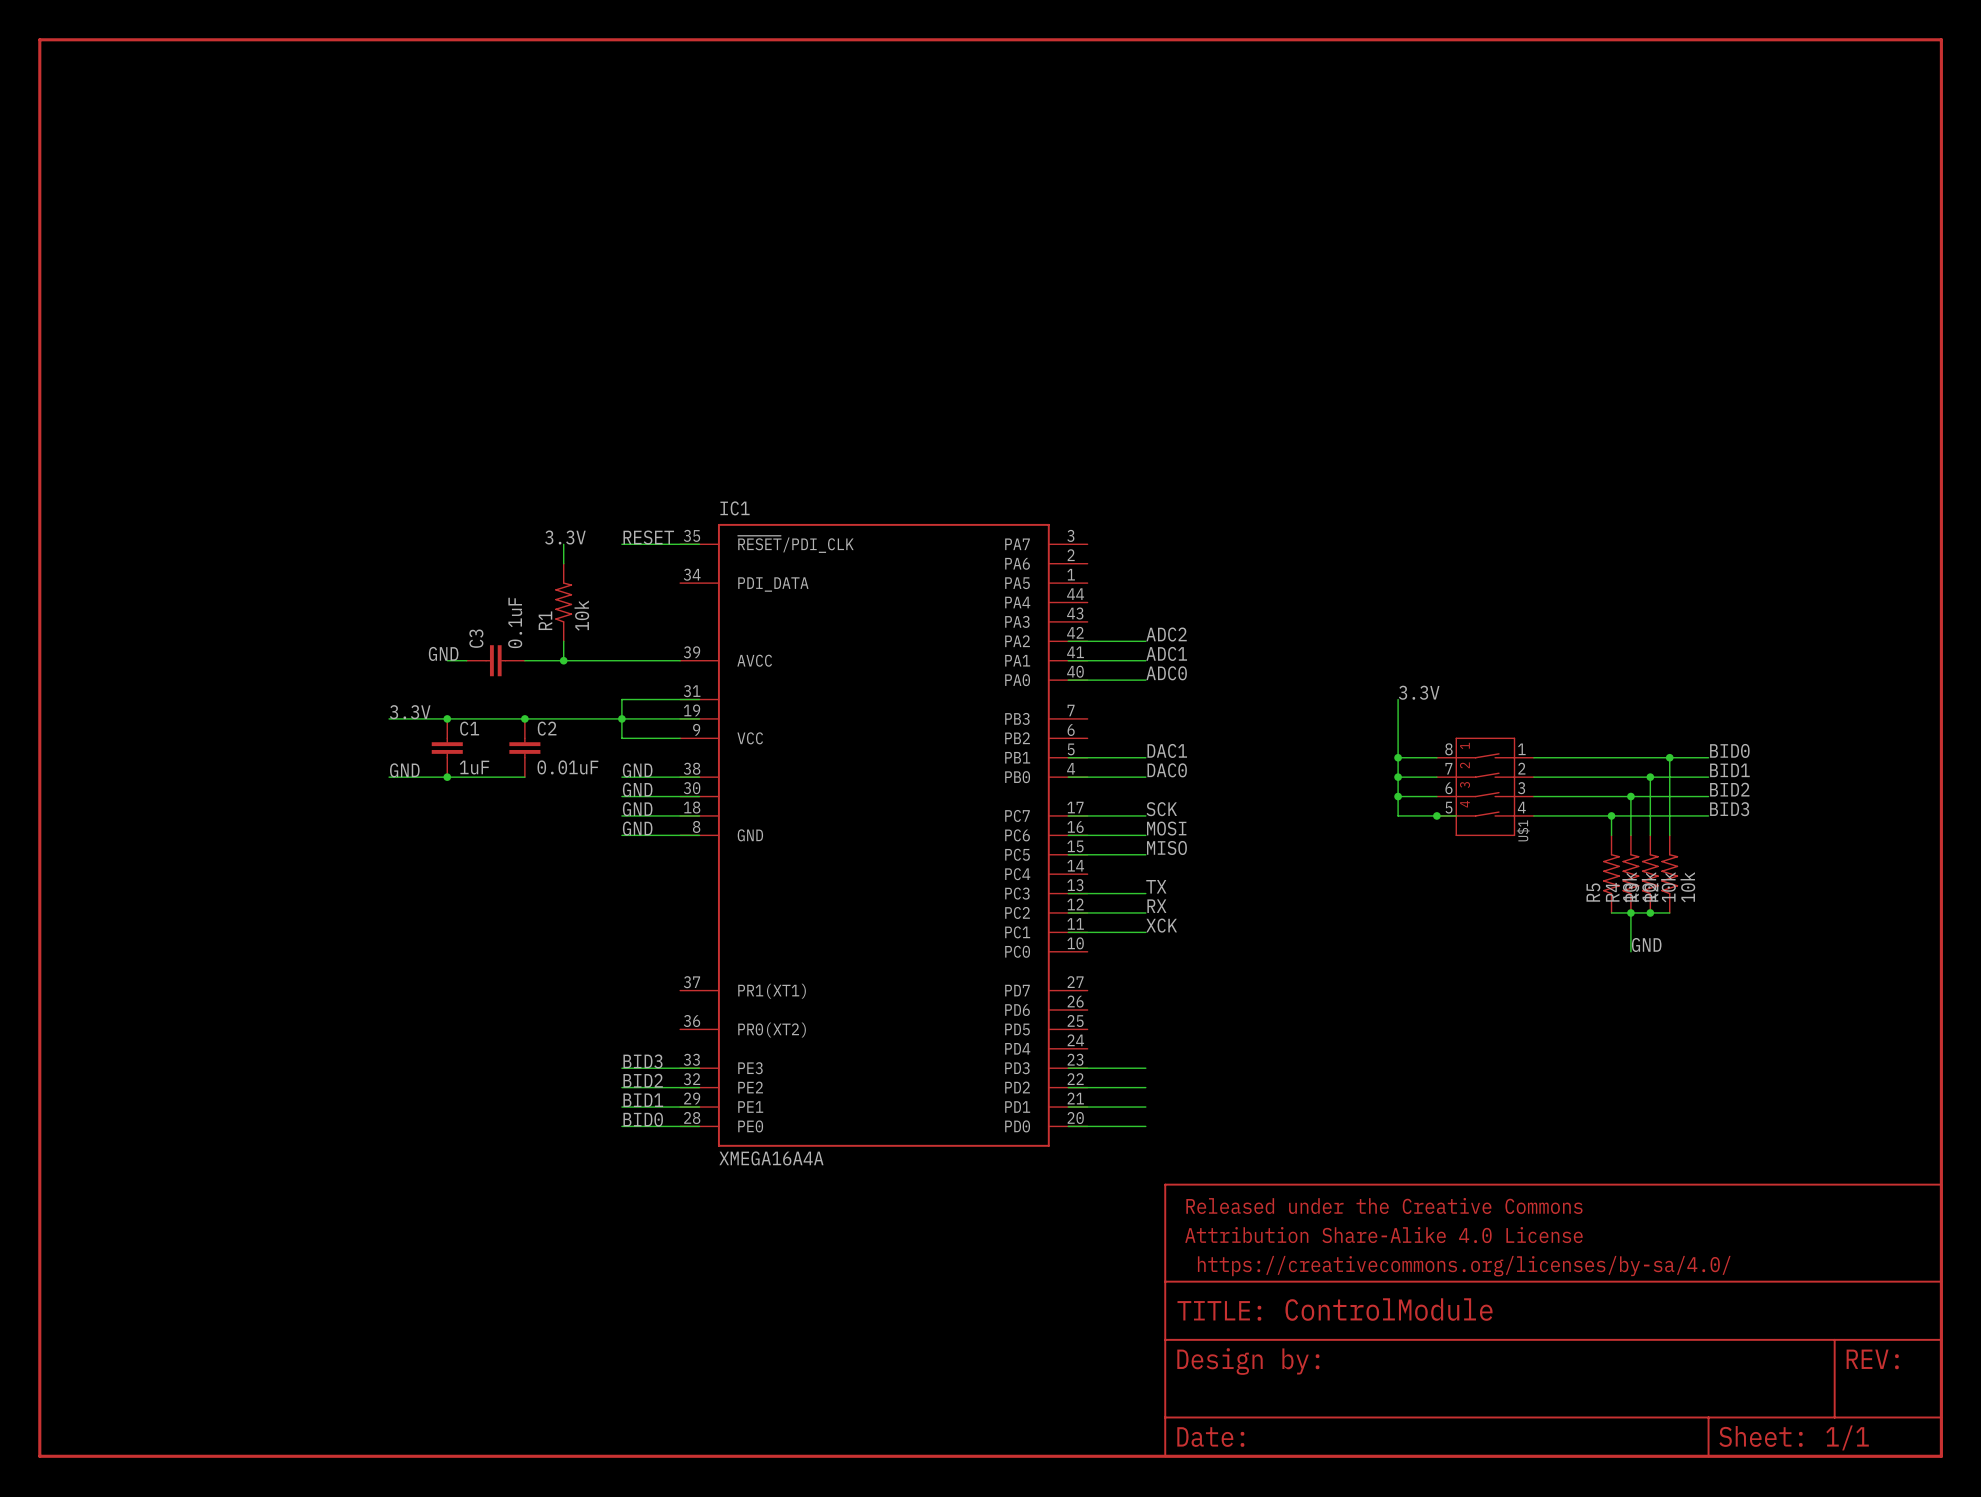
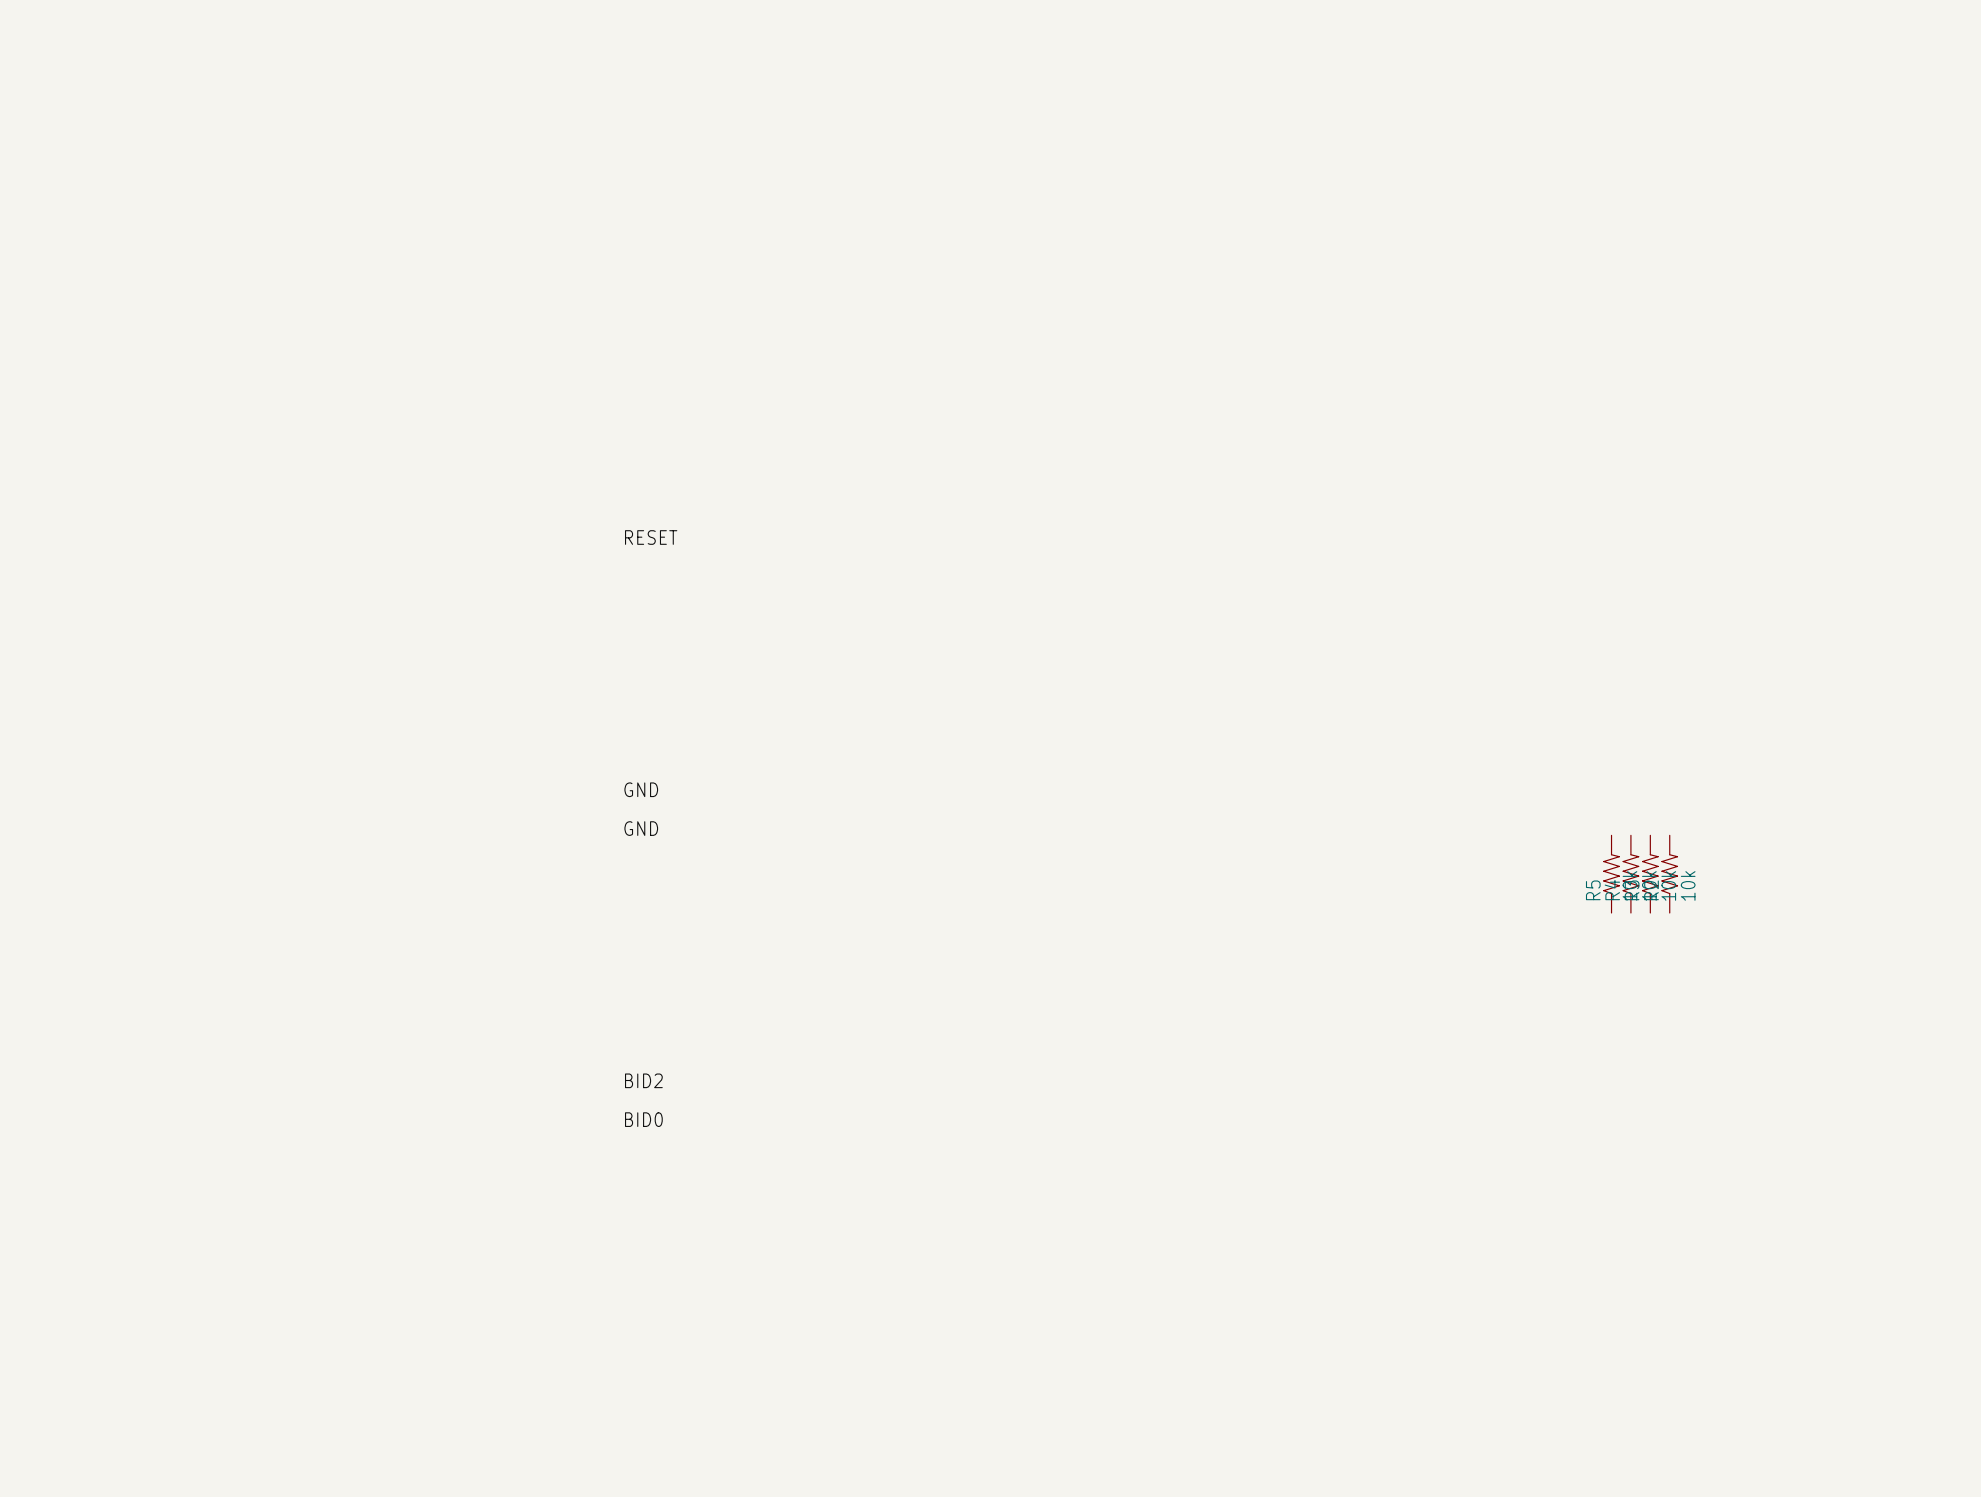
label: 3.3V (565, 537) -> none
wire: (563, 544) (563, 563) -> none
wire: (621, 544) (699, 544) -> none
R1: 10k (563, 602) -> none
label: ADC2 (1166, 634) -> none
wire: (563, 641) (563, 660) -> none
wire: (1068, 641) (1145, 641) -> none
label: GND (443, 653) -> none
label: ADC1 (1166, 653) -> none
wire: (447, 660) (466, 660) -> none
C3: 0.1uF (495, 660) -> none
wire: (524, 660) (680, 660) -> none
junction: (563, 660) -> none
wire: (1068, 660) (1145, 660) -> none
label: ADC0 (1166, 673) -> none
wire: (1068, 680) (1145, 680) -> none
label: 3.3V (1419, 692) -> none
wire: (699, 699) (621, 699) (621, 738) (680, 738) -> none
wire: (1398, 699) (1398, 815) (1456, 815) -> none
label: 3.3V (410, 712) -> none
wire: (389, 718) (699, 718) -> none
junction: (447, 718) -> none
junction: (524, 718) -> none
junction: (621, 718) -> none
C1: 1uF (447, 748) -> none
C2: 0.01uF (524, 748) -> none
part: (990, 748) -> none
label: DAC1 (1167, 750) -> none
label: BID0 (1729, 750) -> none
wire: (1068, 757) (1145, 757) -> none
wire: (1398, 757) (1436, 757) -> none
junction: (1398, 757) -> none
wire: (1533, 757) (1708, 757) -> none
wire: (1669, 757) (1669, 835) -> none
junction: (1669, 757) -> none
label: GND (404, 770) -> none
label: GND (637, 770) -> none
label: DAC0 (1167, 770) -> none
label: BID1 (1729, 770) -> none
wire: (389, 777) (524, 777) -> none
junction: (447, 777) -> none
wire: (621, 777) (699, 777) -> none
wire: (1068, 777) (1145, 777) -> none
wire: (1398, 777) (1436, 777) -> none
junction: (1398, 777) -> none
wire: (1533, 777) (1708, 777) -> none
wire: (1650, 777) (1650, 835) -> none
junction: (1650, 777) -> none
U$1: (1485, 786) -> none
label: BID2 (1729, 789) -> none
wire: (621, 796) (699, 796) -> none
wire: (1398, 796) (1436, 796) -> none
junction: (1398, 796) -> none
wire: (1533, 796) (1708, 796) -> none
wire: (1630, 796) (1630, 835) -> none
junction: (1630, 796) -> none
label: GND (637, 809) -> none
label: SCK (1161, 809) -> none
label: BID3 (1729, 809) -> none
wire: (621, 815) (699, 815) -> none
wire: (1068, 815) (1145, 815) -> none
junction: (1436, 815) -> none
wire: (1533, 815) (1708, 815) -> none
wire: (1611, 815) (1611, 835) -> none
junction: (1611, 815) -> none
label: MOSI (1166, 828) -> none
wire: (621, 835) (699, 835) -> none
IC1: XMEGA16A4A (883, 835) -> none
wire: (1068, 835) (1145, 835) -> none
label: MISO (1166, 847) -> none
wire: (1068, 854) (1145, 854) -> none
label: TX (1156, 886) -> none
wire: (1068, 893) (1145, 893) -> none
label: RX (1156, 906) -> none
wire: (1068, 912) (1145, 912) -> none
wire: (1611, 912) (1669, 912) -> none
wire: (1630, 912) (1630, 951) -> none
junction: (1630, 912) -> none
junction: (1650, 912) -> none
label: XCK (1161, 925) -> none
wire: (1068, 932) (1145, 932) -> none
label: GND (1646, 944) -> none
label: BID3 (642, 1061) -> none
wire: (621, 1068) (699, 1068) -> none
wire: (1068, 1068) (1145, 1068) -> none
wire: (621, 1087) (699, 1087) -> none
wire: (1068, 1087) (1145, 1087) -> none
label: BID1 (643, 1100) -> none
wire: (621, 1107) (699, 1107) -> none
wire: (1068, 1107) (1145, 1107) -> none
wire: (621, 1126) (699, 1126) -> none
wire: (1068, 1126) (1145, 1126) -> none
part: (1553, 1320) -> none

